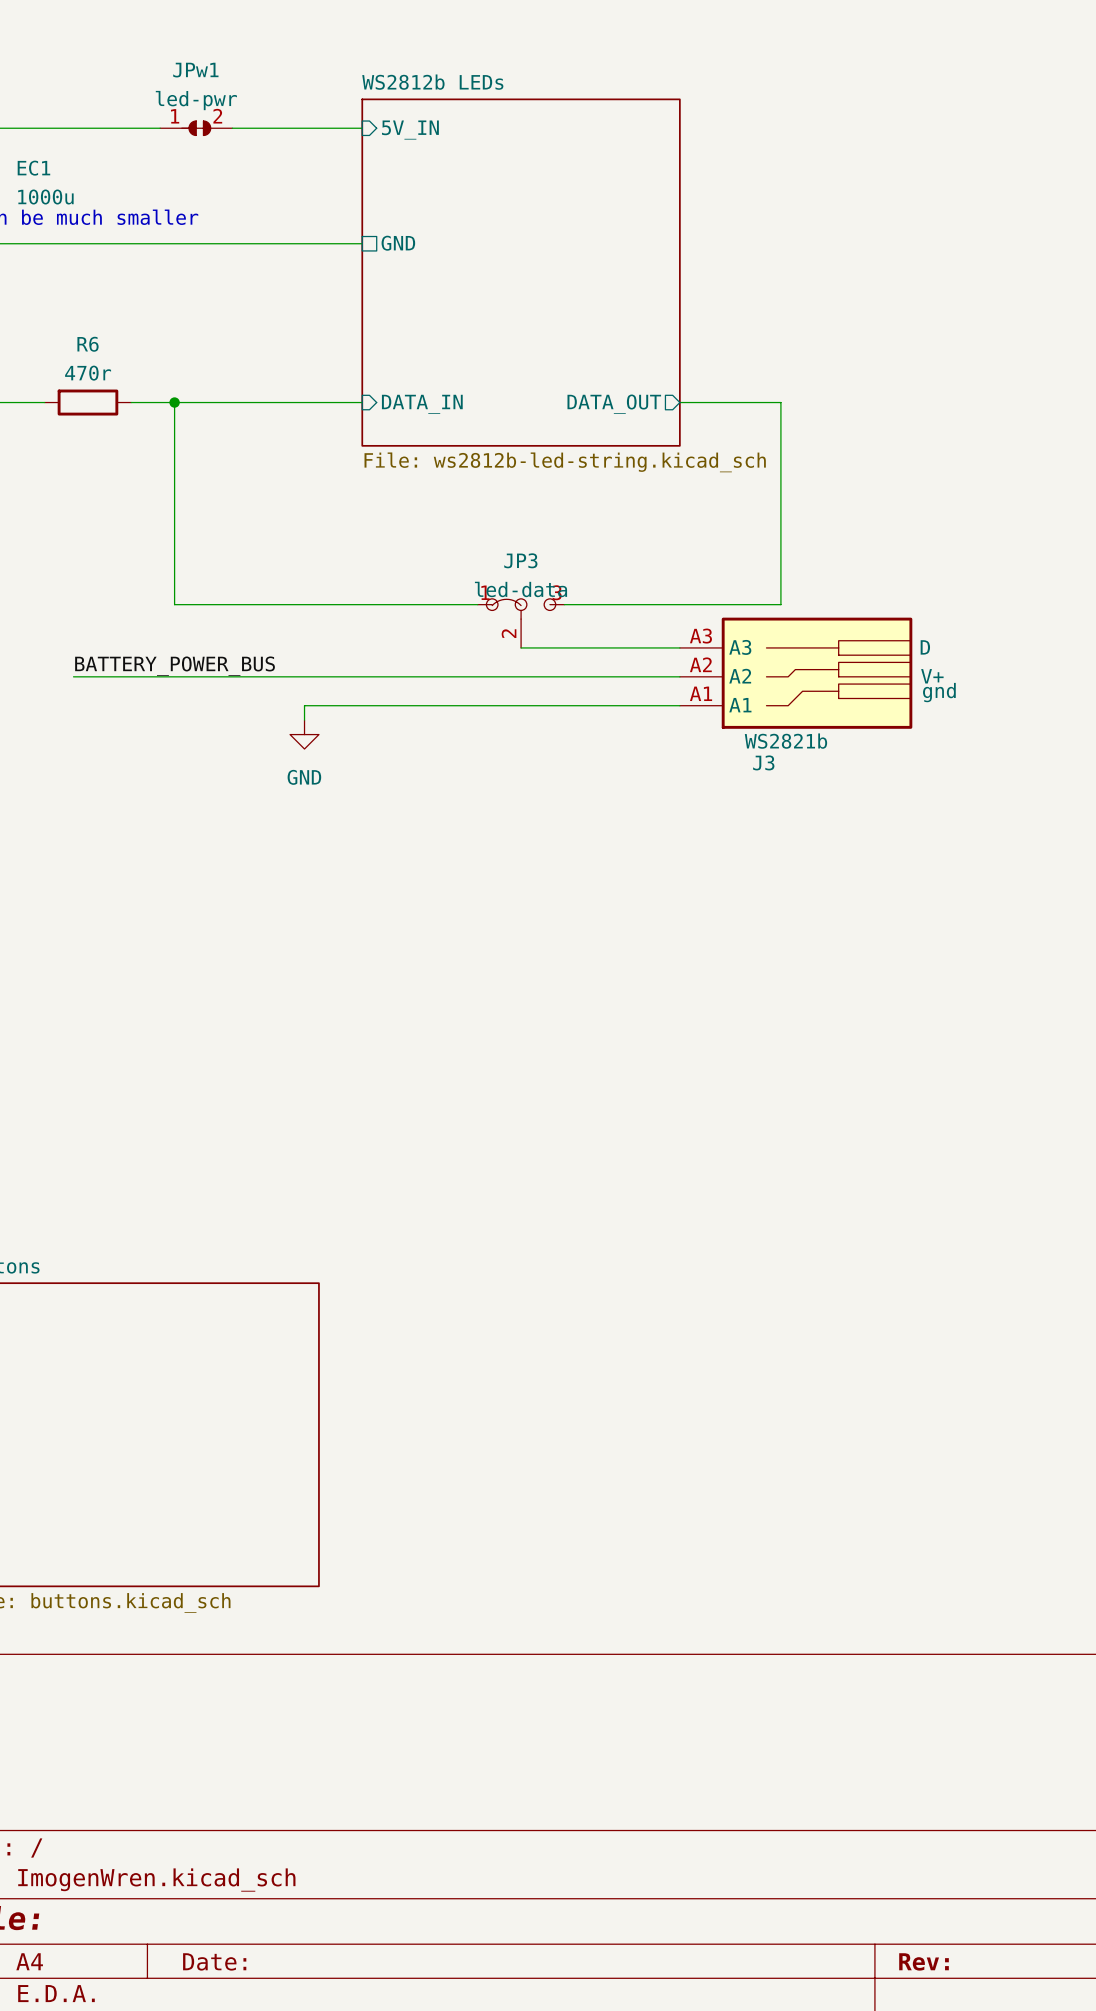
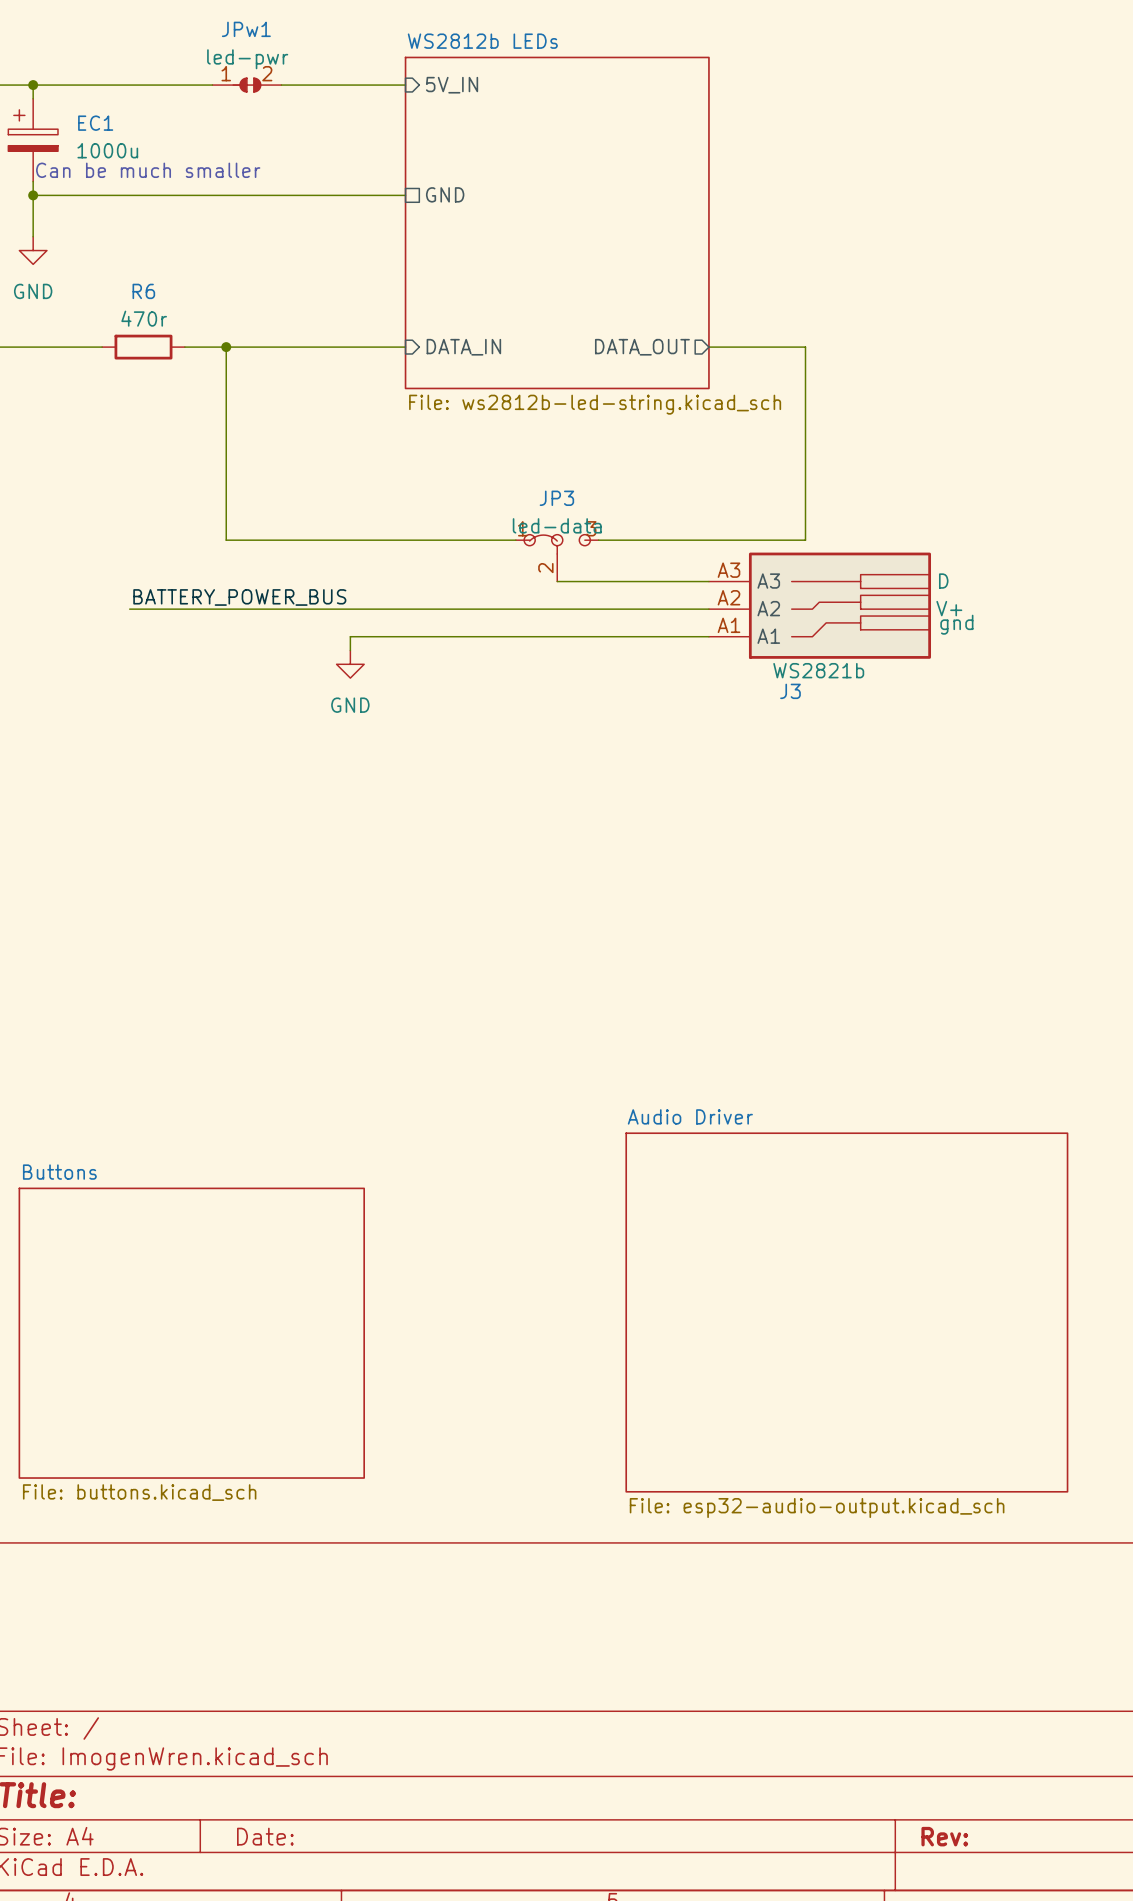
sheet Audio Driver: none -> File: esp32-audio-output.kicad_sch (846, 1312)

